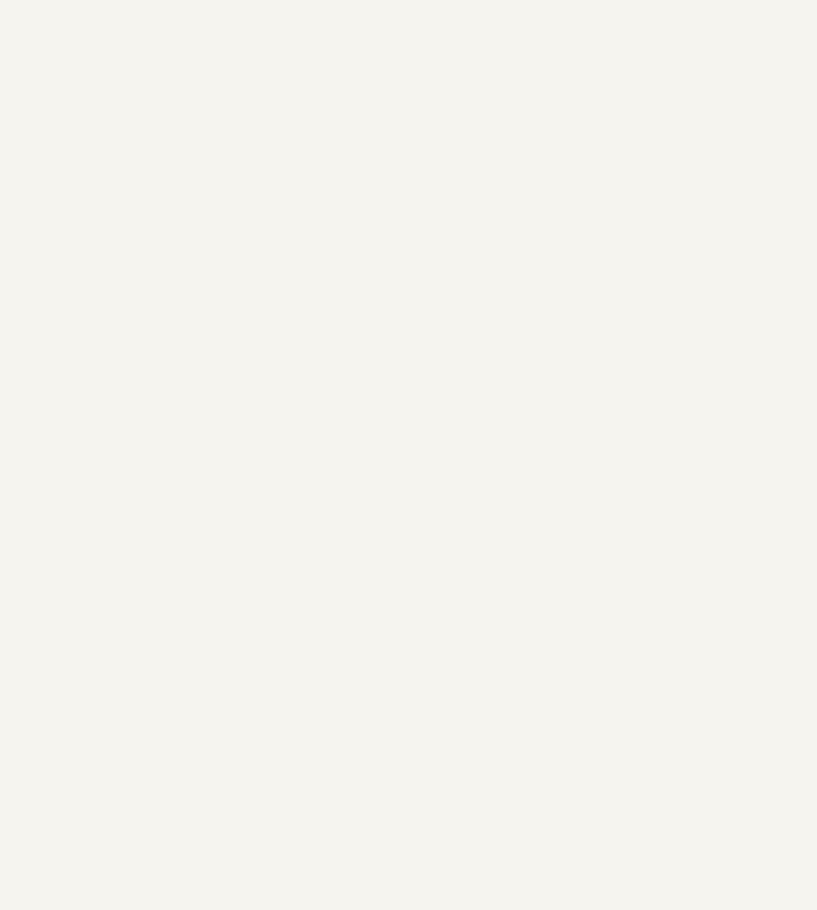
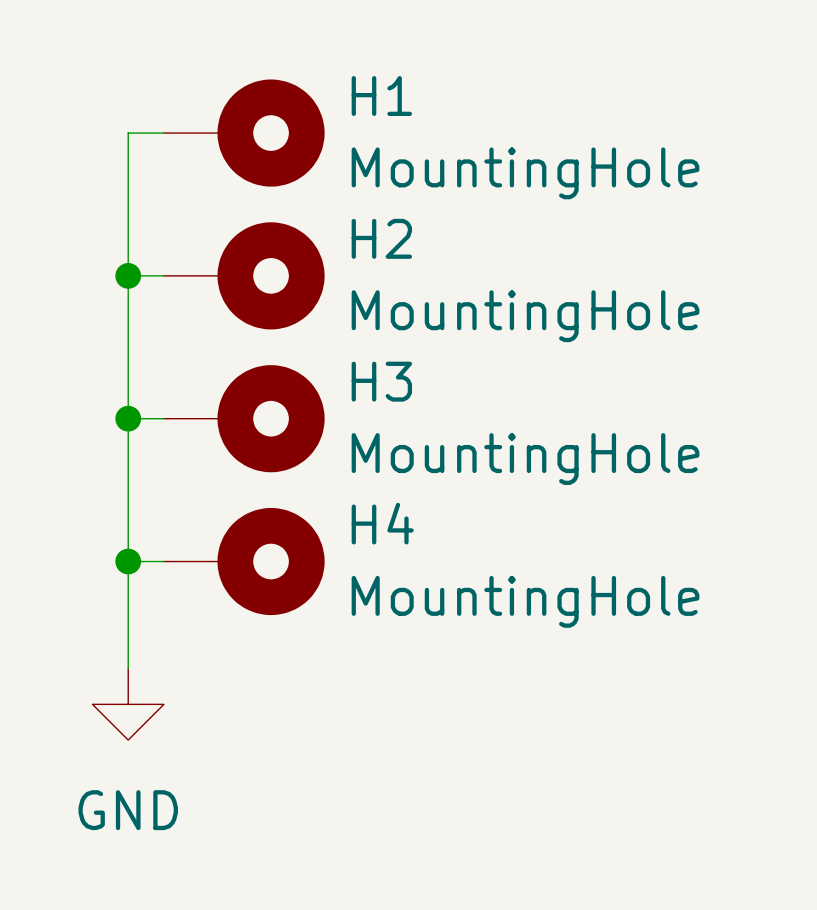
wire: none -> (163, 133) (128, 133) (128, 668)
H1: none -> MountingHole (244, 133)
wire: none -> (128, 275) (163, 275)
junction: none -> (128, 275)
H2: none -> MountingHole (244, 275)
wire: none -> (128, 418) (163, 418)
junction: none -> (128, 418)
H3: none -> MountingHole (244, 418)
wire: none -> (128, 561) (163, 561)
junction: none -> (128, 561)
H4: none -> MountingHole (244, 561)
power symbol: none -> GND (128, 704)

